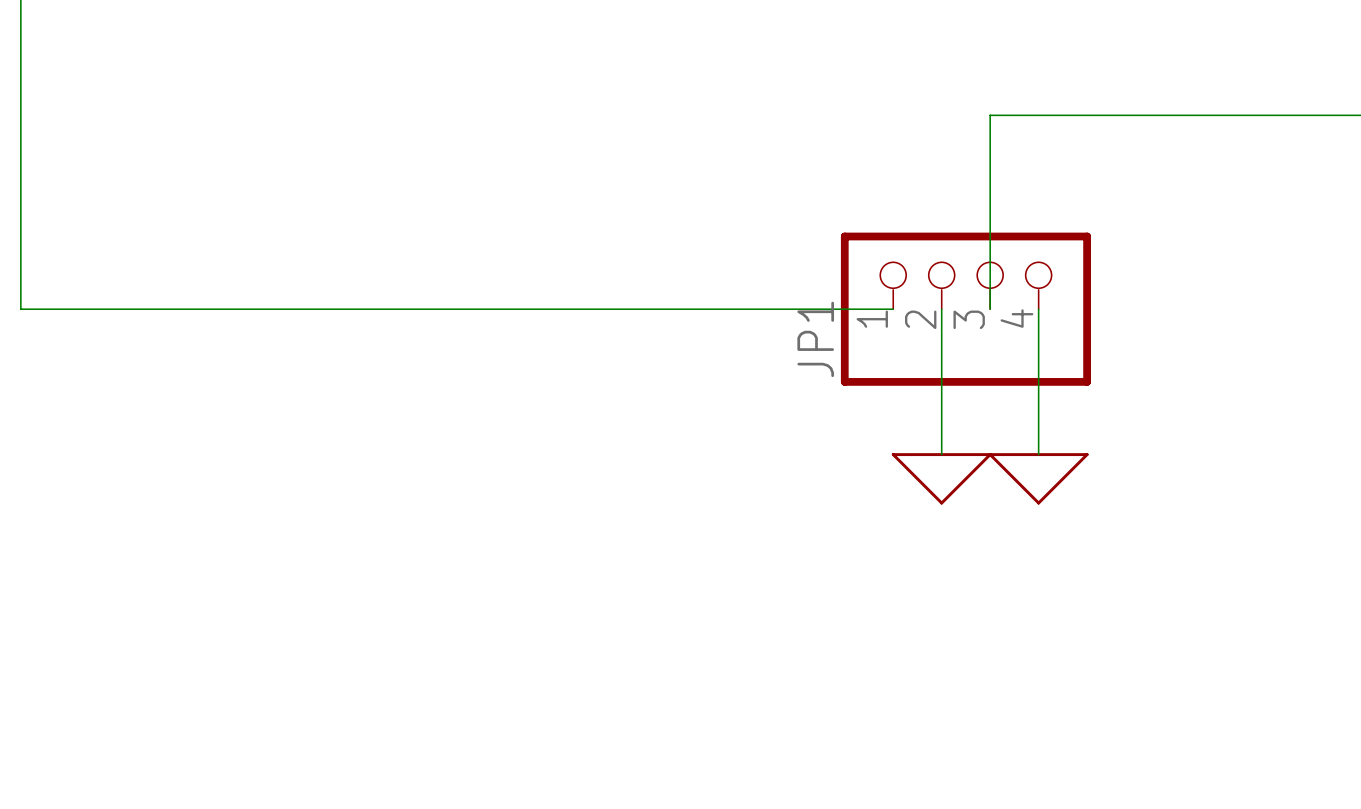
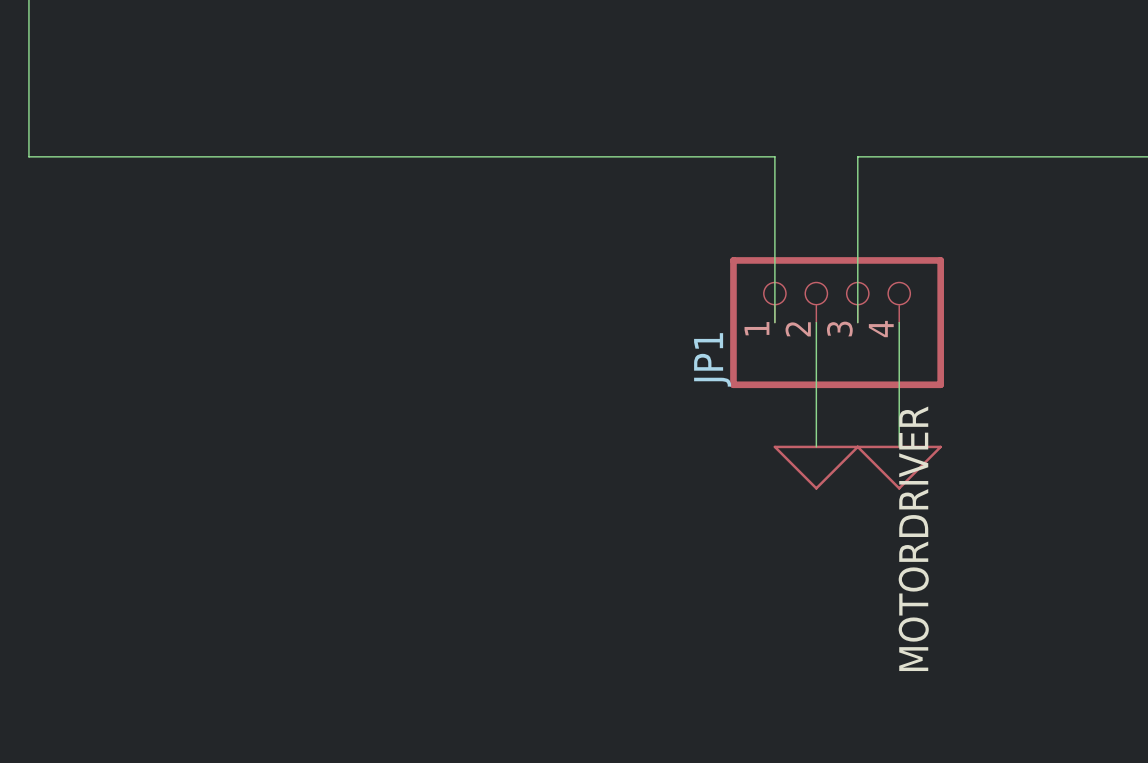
wire: (20, 115) (20, 309) (893, 309) -> (28, 156) (774, 156) (774, 322)
label: none -> MOTORDRIVER (913, 538)

